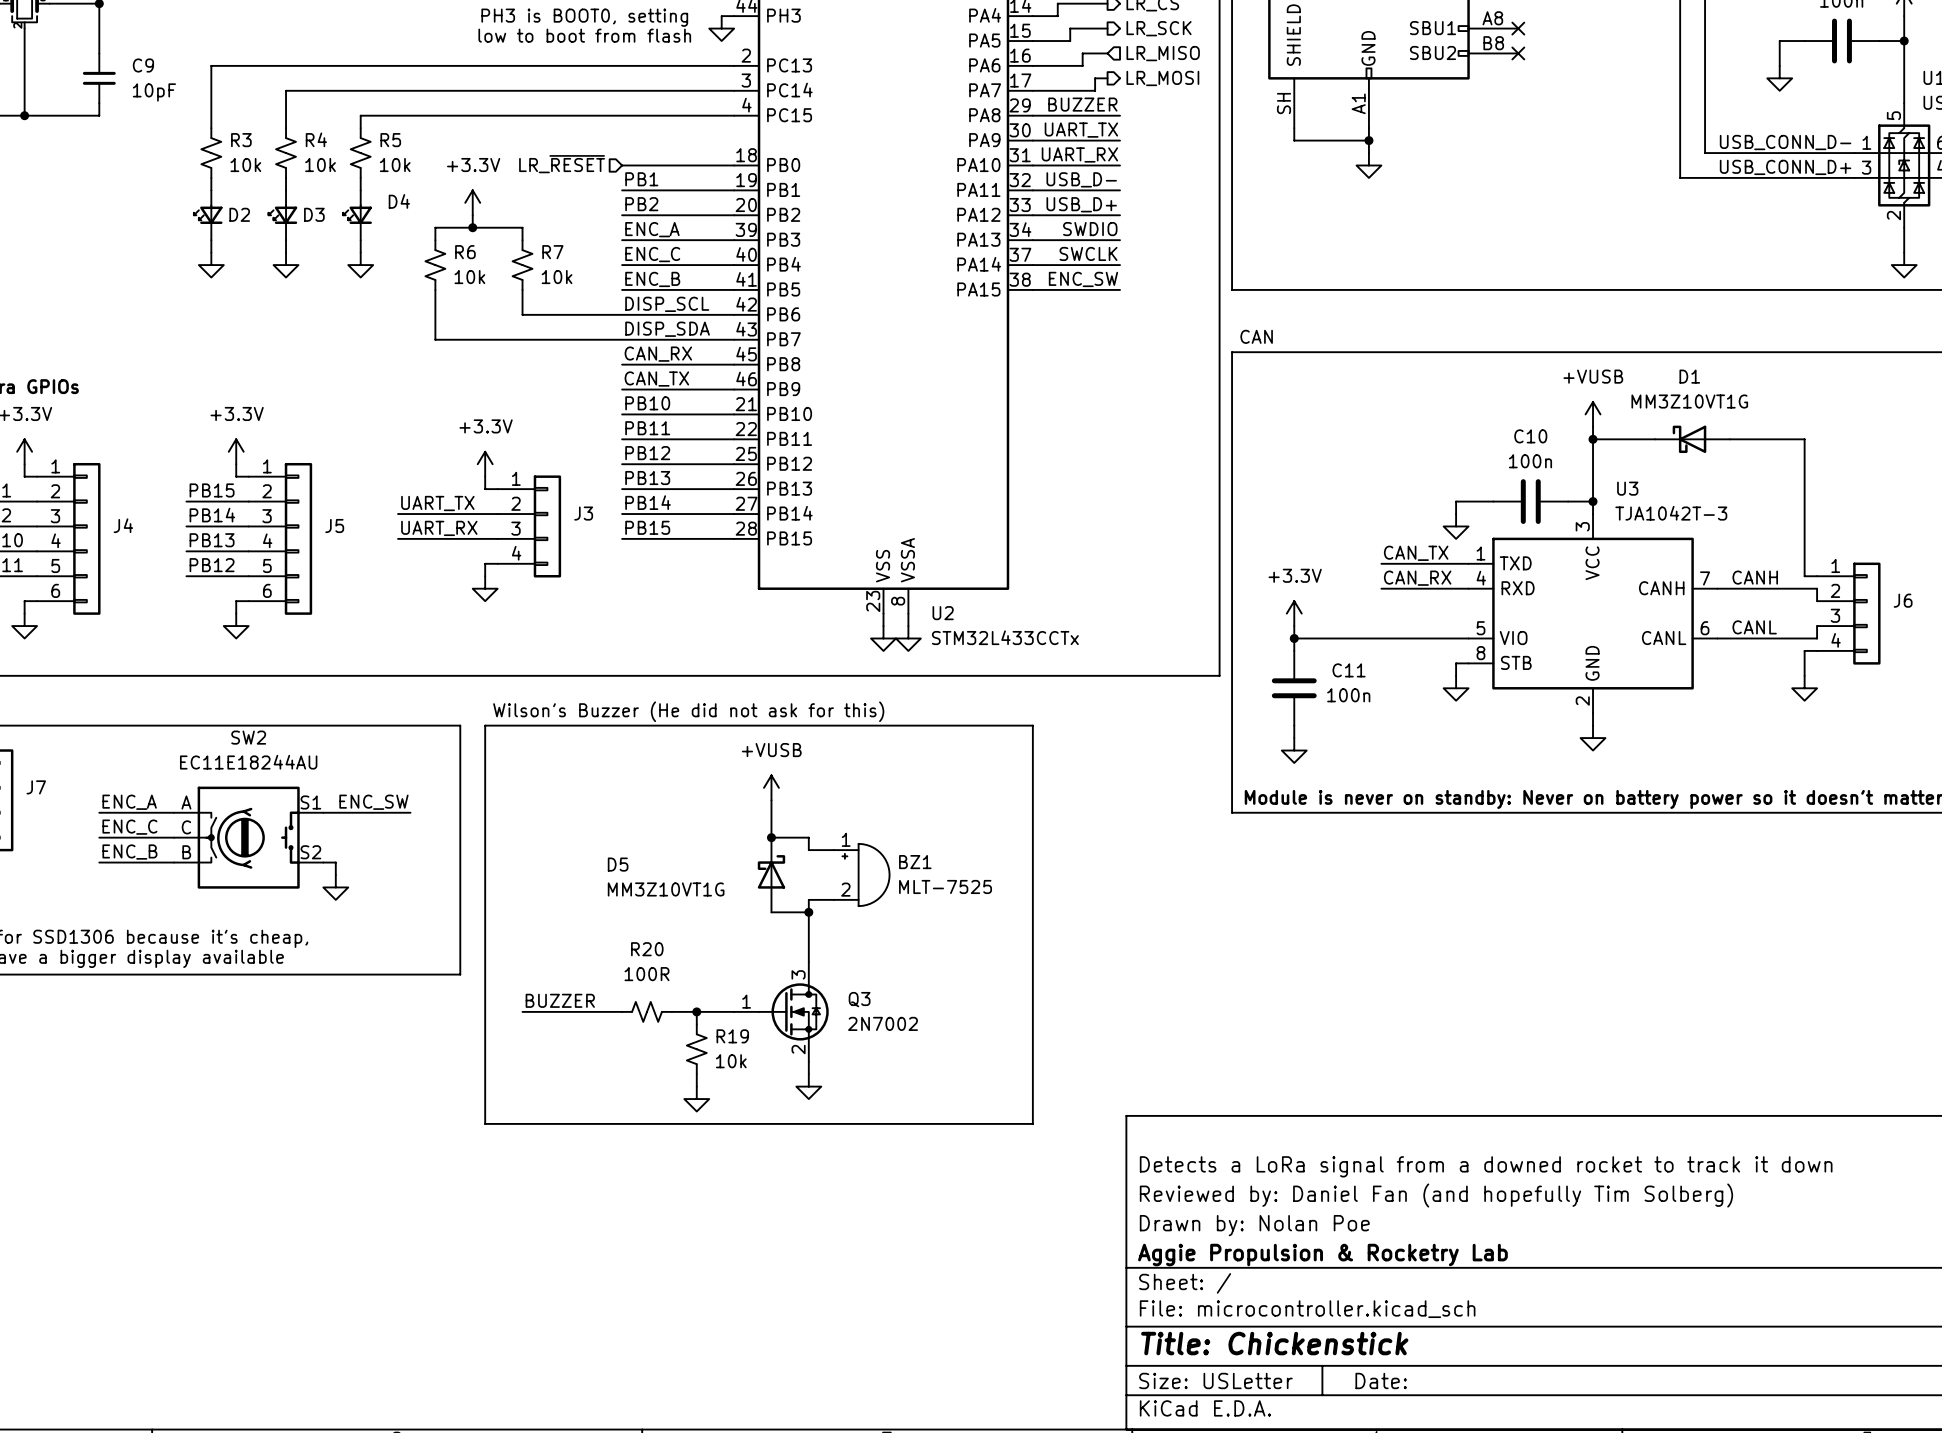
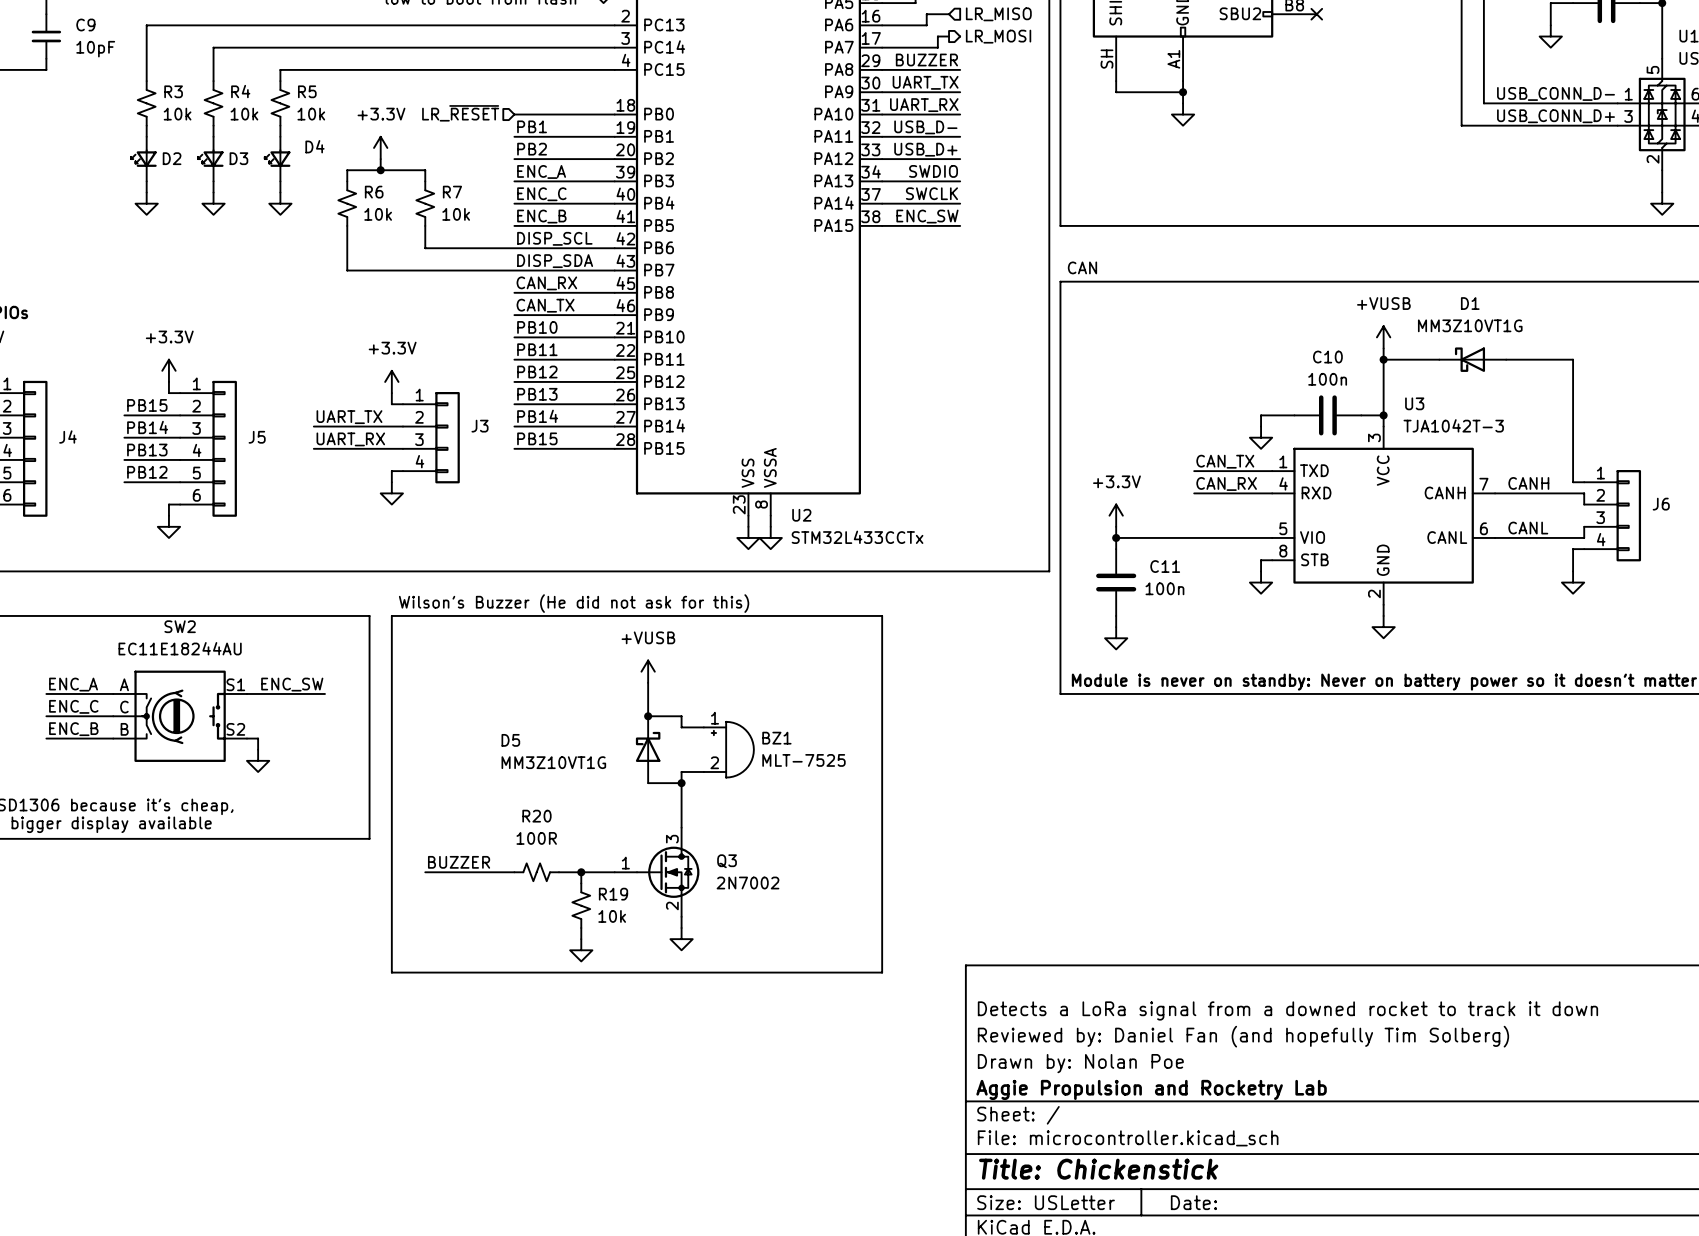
title block: Aggie Propulsion & Rocketry Lab (1322, 1255) -> Aggie Propulsion and Rocketry Lab (1151, 1089)

